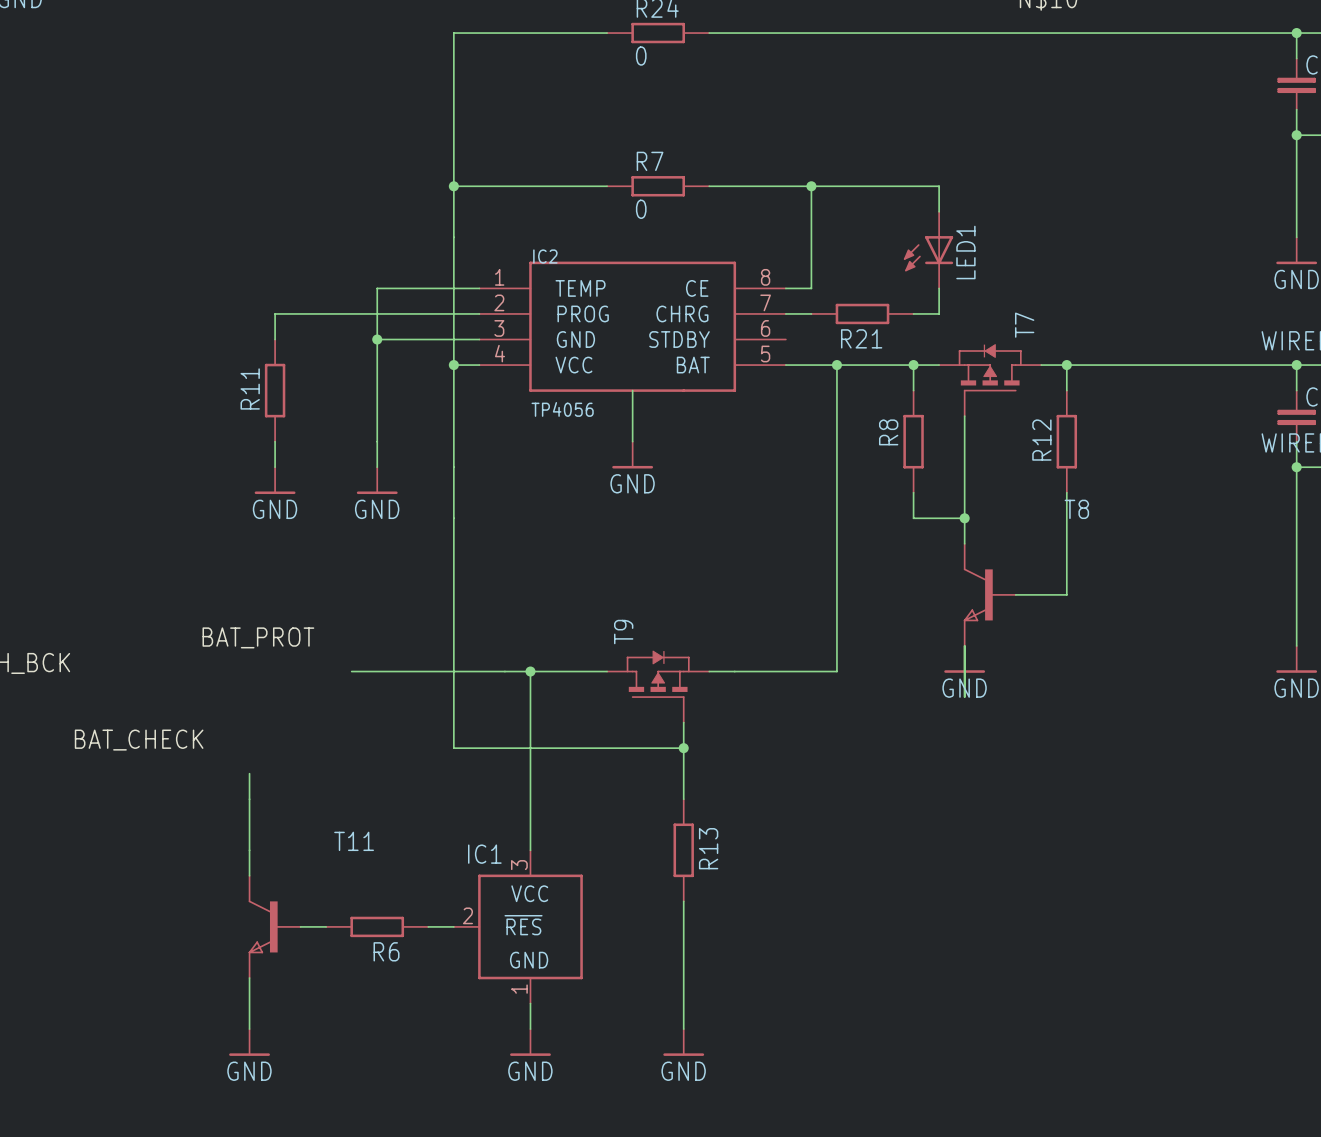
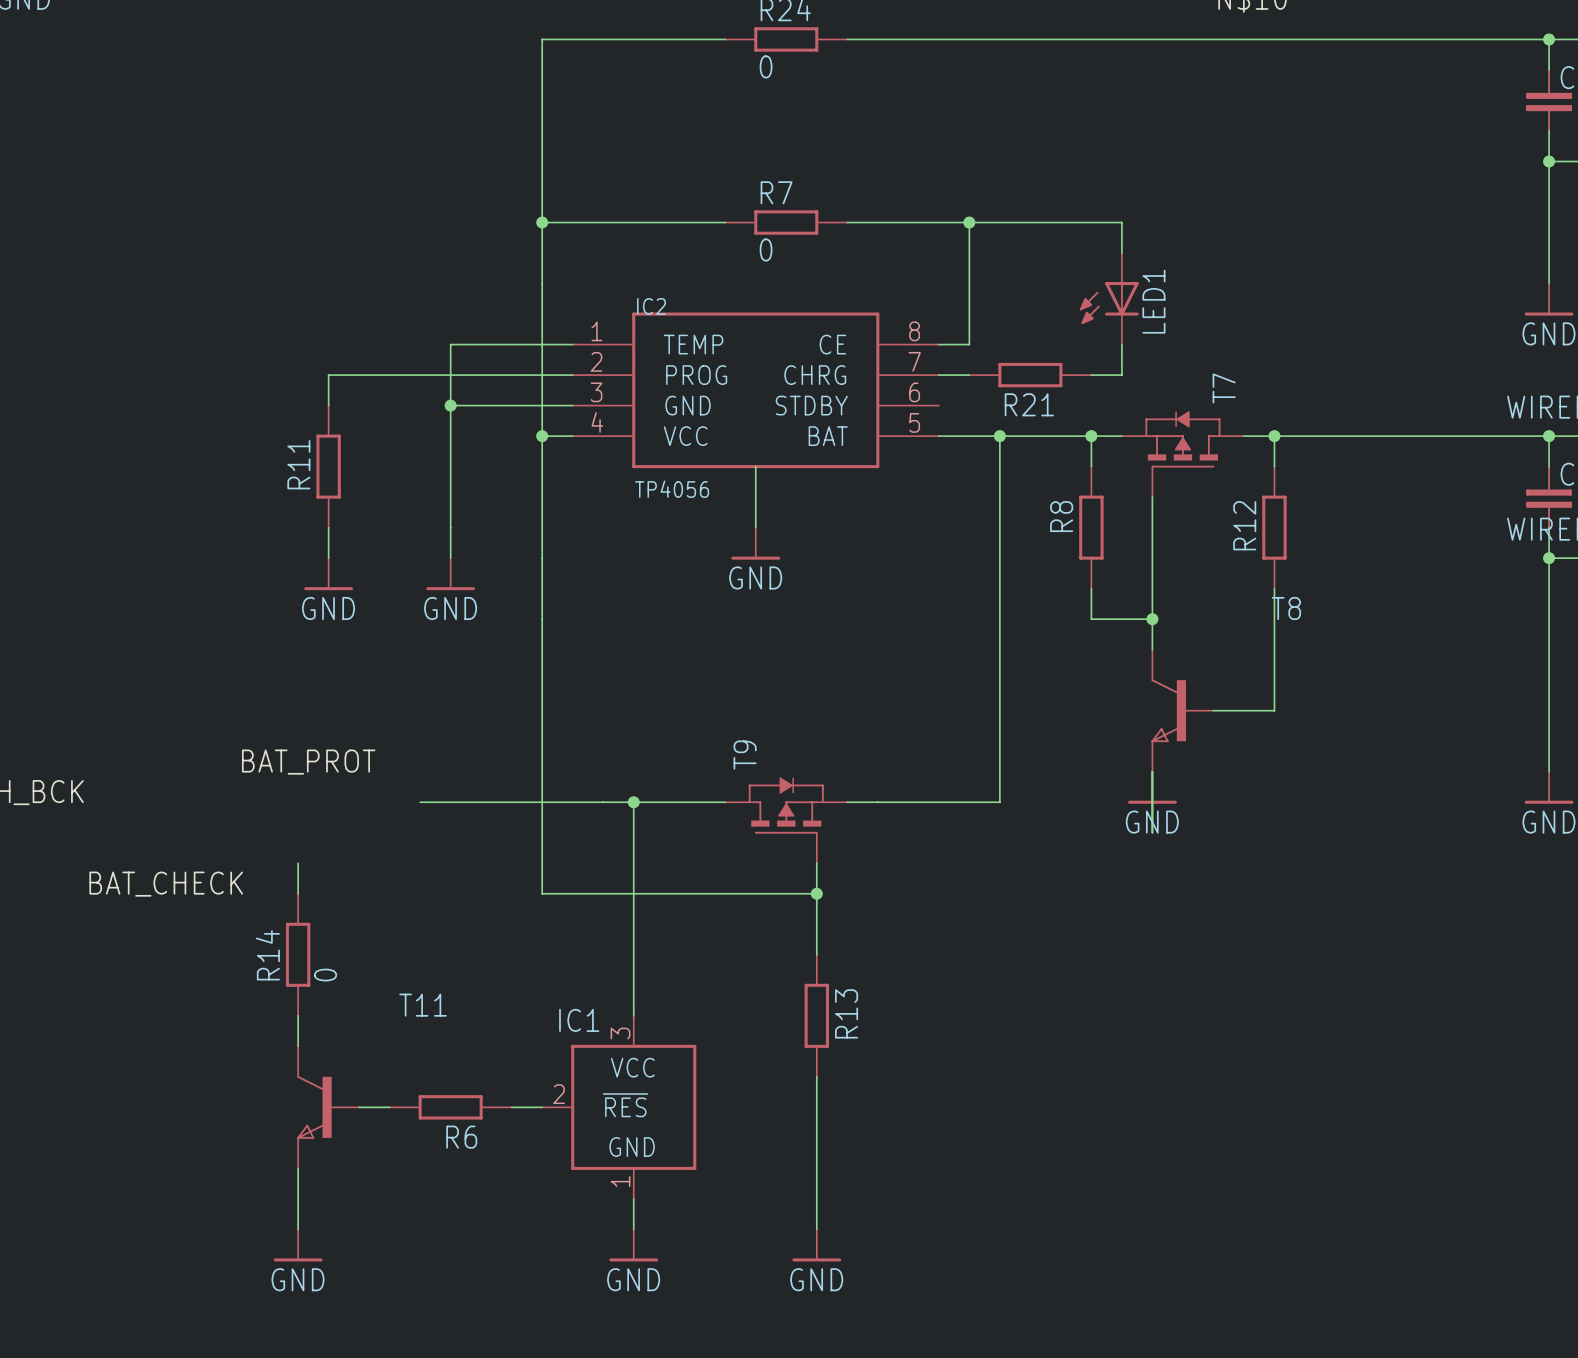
wire: none -> (298, 863) (298, 893)
wire: (249, 773) (249, 850) -> none
R14: none -> 0 (298, 954)

